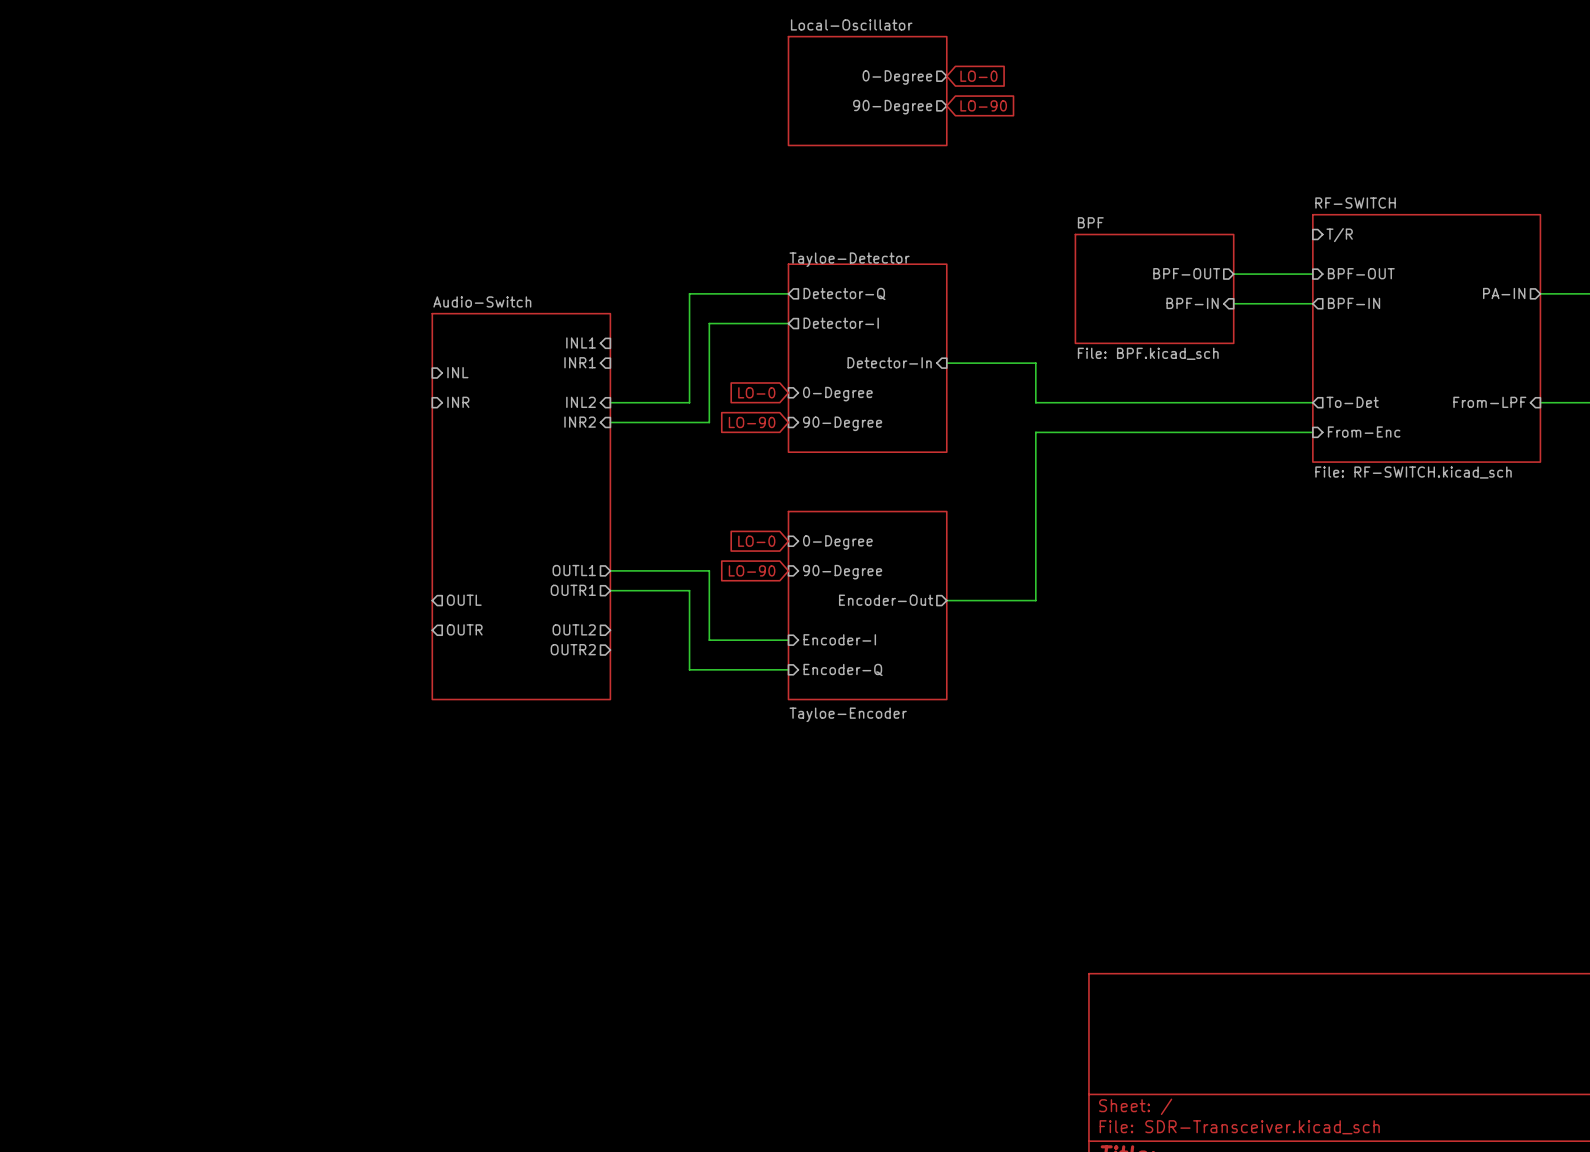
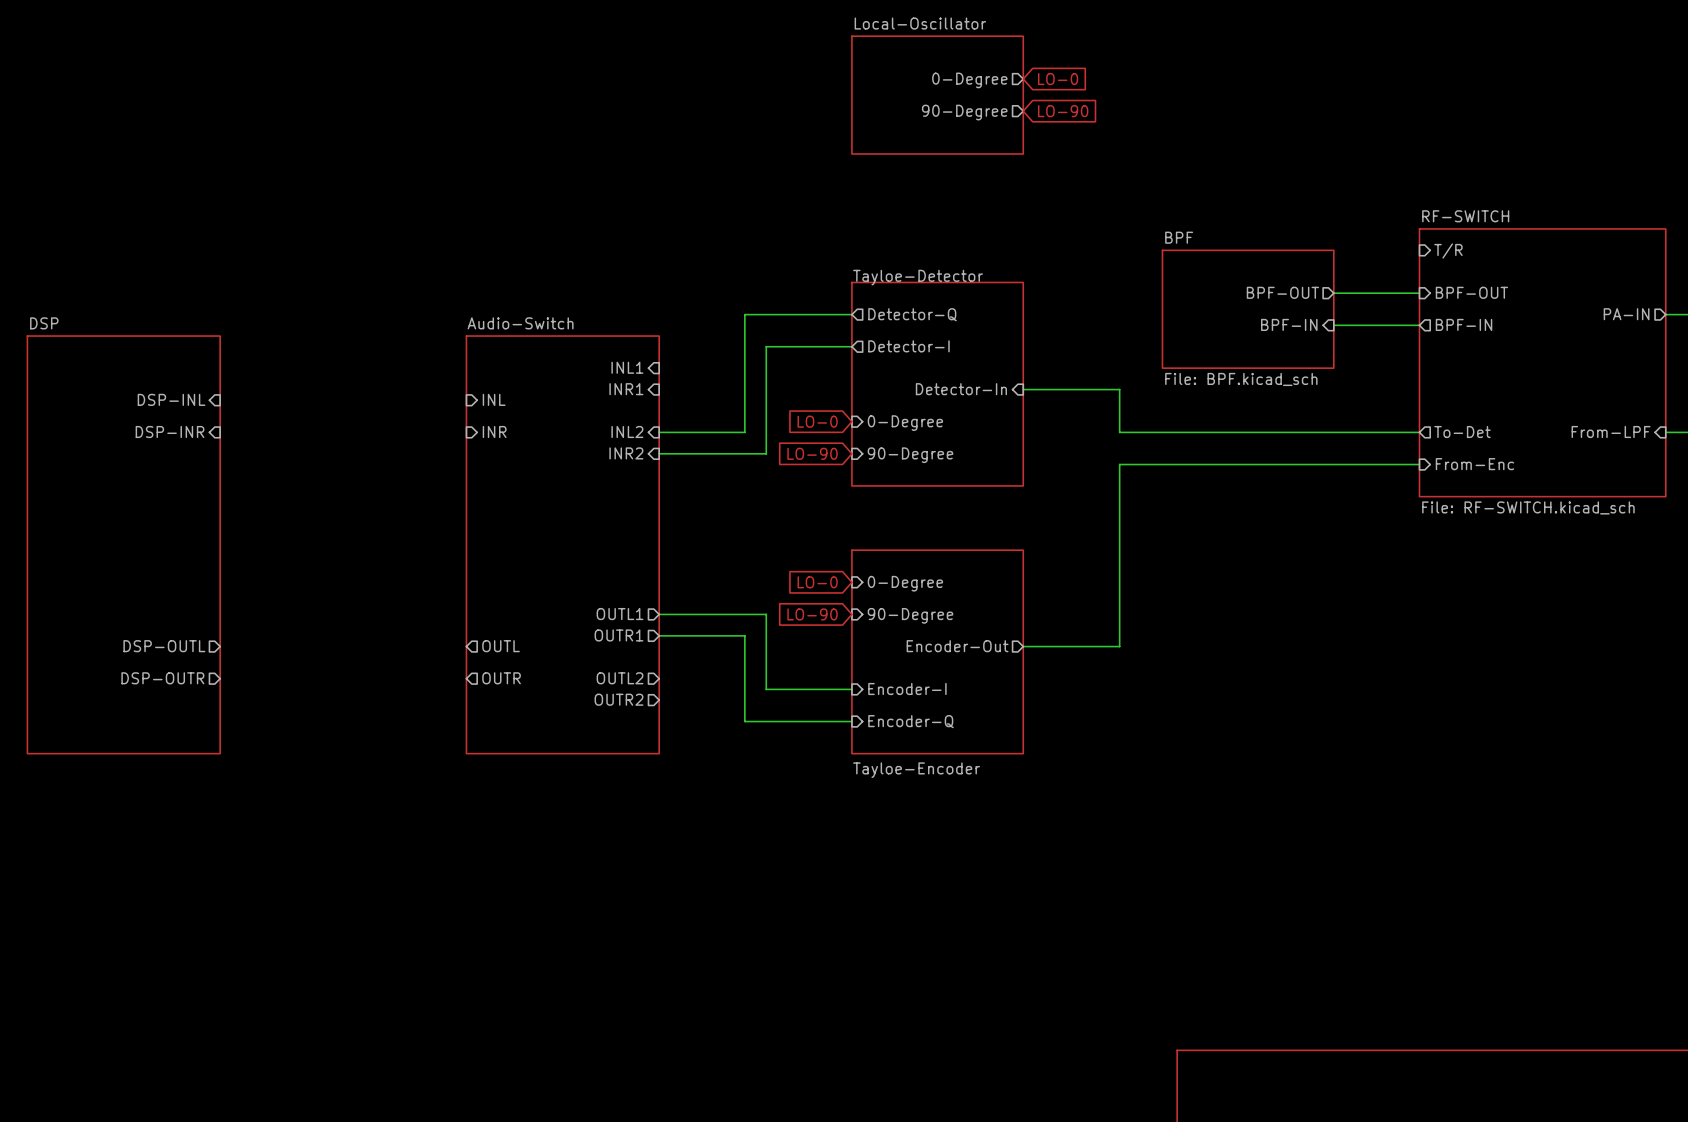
sheet pin: none -> DSP-INL (171, 399)
sheet pin: none -> DSP-INR (170, 432)
sheet DSP: none -> (123, 544)
sheet pin: none -> DSP-OUTL (164, 646)
sheet pin: none -> DSP-OUTR (162, 678)

